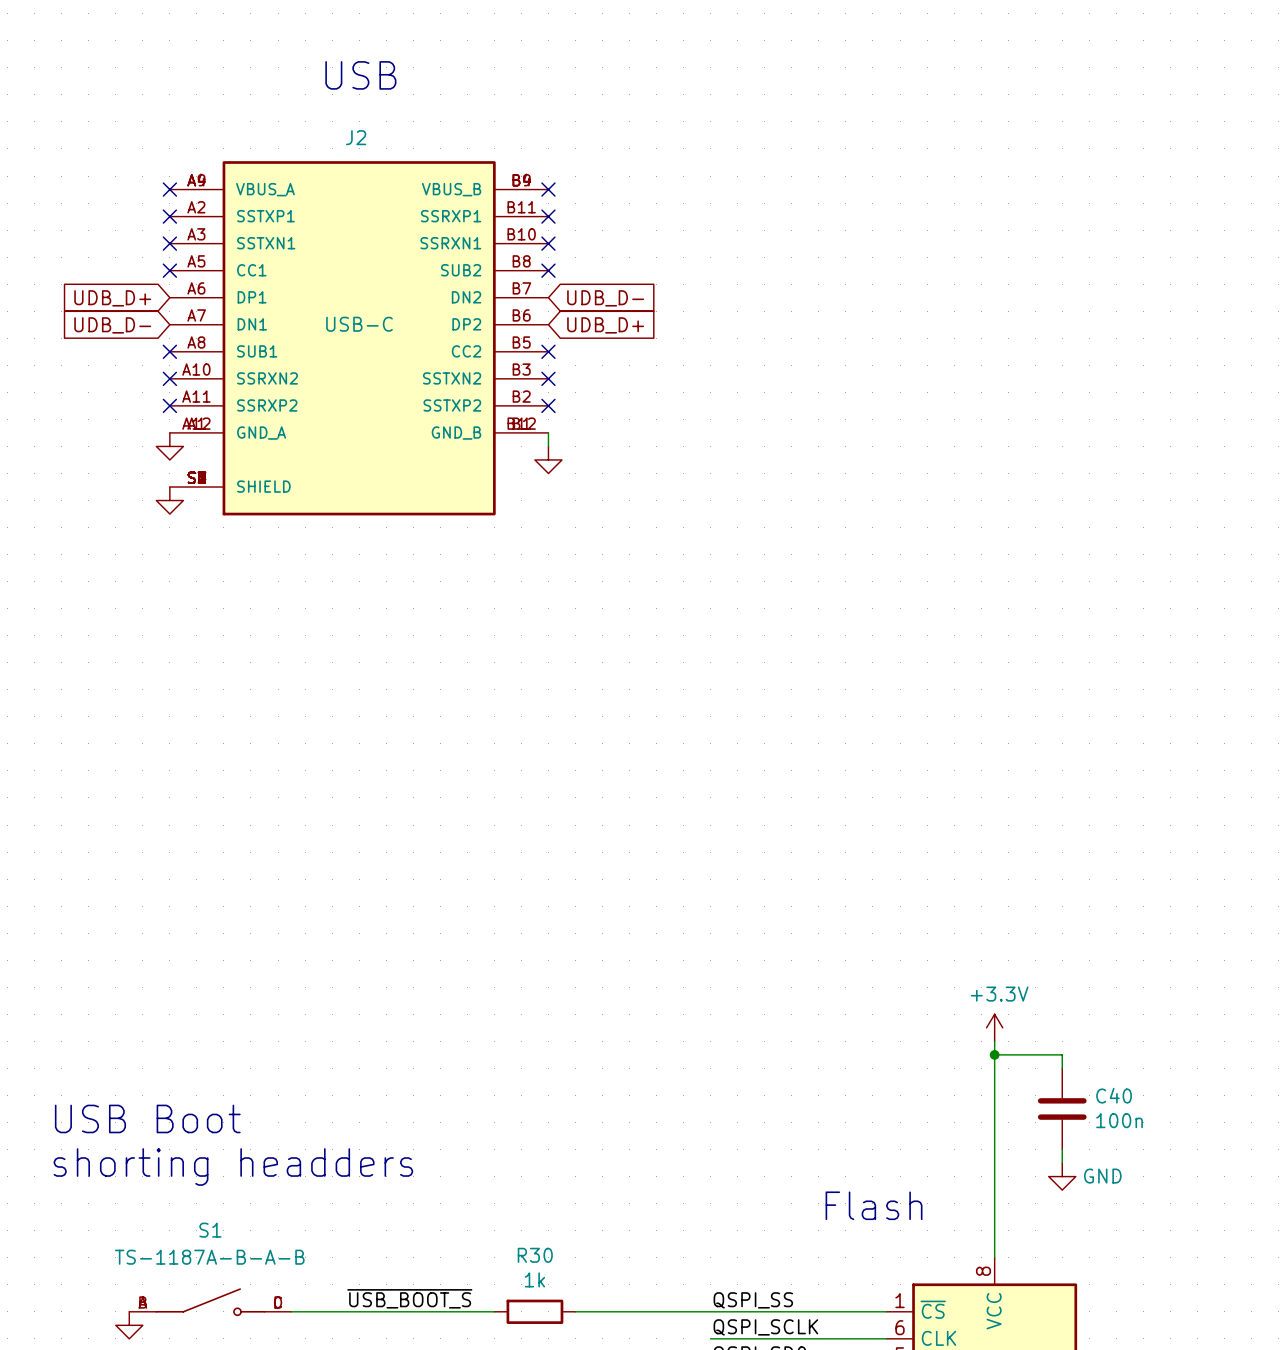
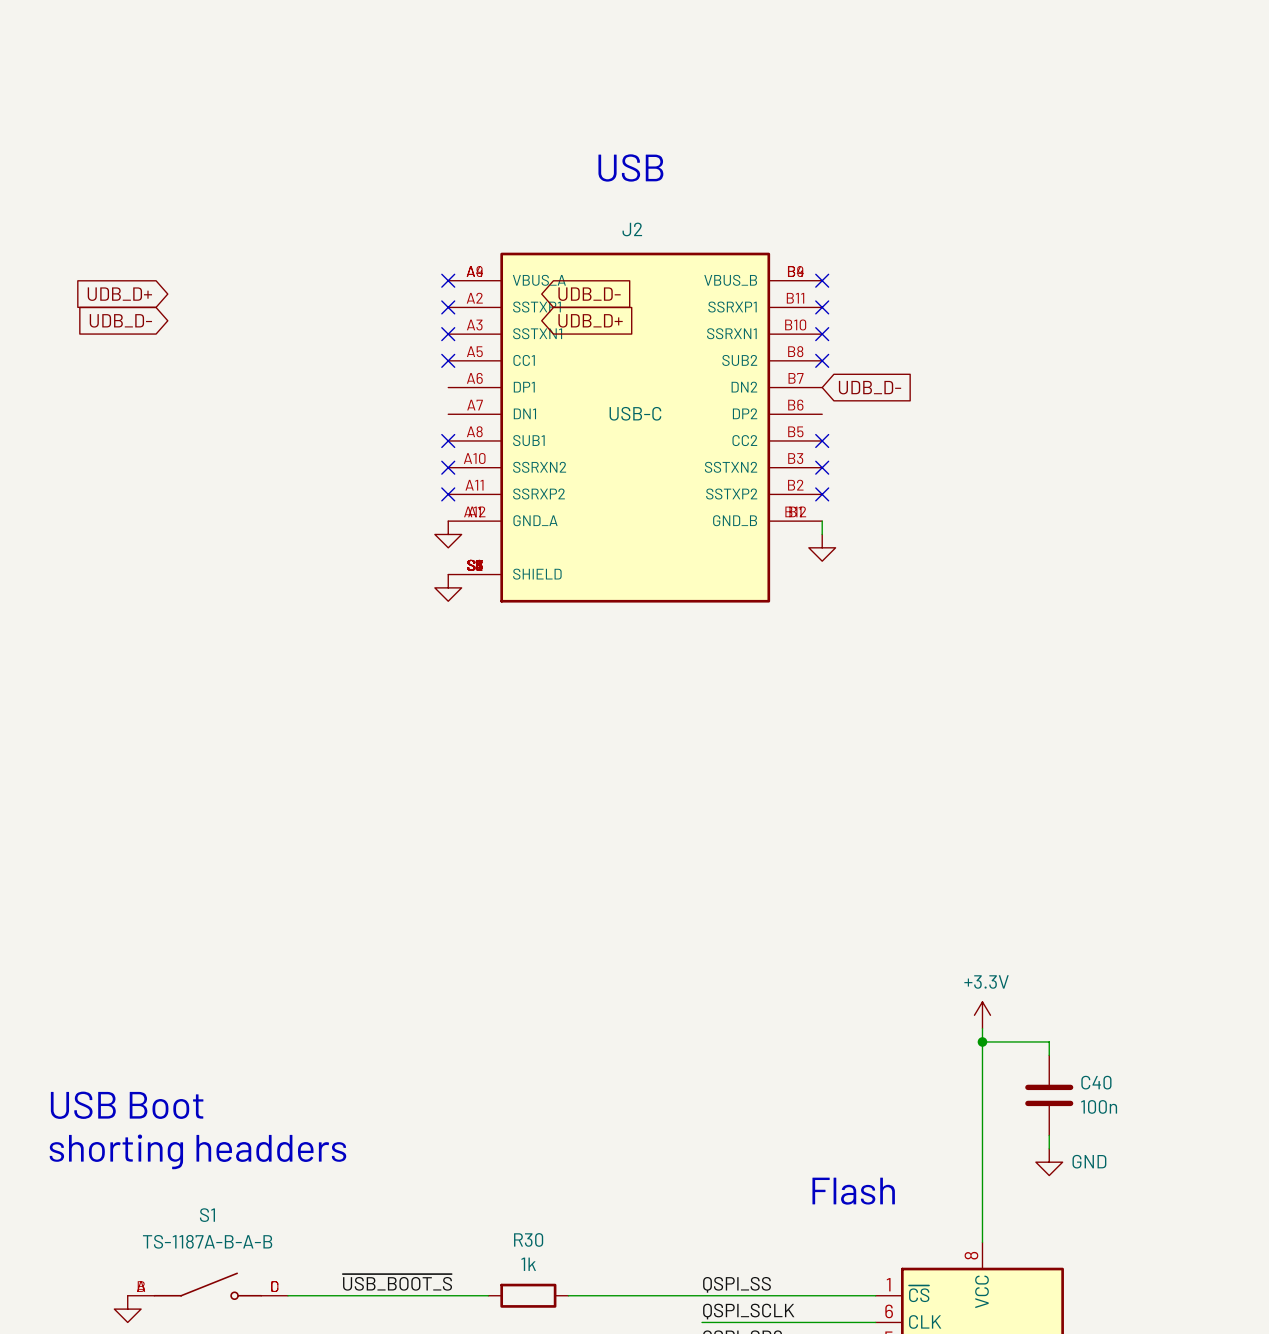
text: USB (360, 75) -> none
text: none -> USB (630, 167)
no-connect mark: (169, 189) -> none
no-connect mark: (548, 189) -> none
no-connect mark: (169, 216) -> none
no-connect mark: (548, 216) -> none
no-connect mark: (169, 243) -> none
no-connect mark: (548, 243) -> none
no-connect mark: (169, 270) -> none
no-connect mark: (548, 270) -> none
no-connect mark: none -> (448, 280)
no-connect mark: none -> (822, 280)
no-connect mark: none -> (448, 307)
no-connect mark: none -> (822, 307)
J2 position: (359, 338) -> (635, 427)
no-connect mark: none -> (448, 334)
no-connect mark: none -> (822, 334)
no-connect mark: (169, 351) -> none
no-connect mark: (548, 351) -> none
no-connect mark: none -> (448, 360)
no-connect mark: none -> (822, 360)
no-connect mark: (169, 378) -> none
no-connect mark: (548, 378) -> none
global label: none -> UDB_D- (870, 387)
no-connect mark: (169, 405) -> none
no-connect mark: (548, 405) -> none
power symbol: (169, 446) -> none
no-connect mark: none -> (448, 440)
no-connect mark: none -> (822, 440)
power symbol: (548, 459) -> none
no-connect mark: none -> (448, 467)
no-connect mark: none -> (822, 467)
power symbol: (169, 500) -> none
no-connect mark: none -> (448, 494)
no-connect mark: none -> (822, 494)
wire: none -> (822, 521) (822, 534)
power symbol: none -> (448, 534)
power symbol: none -> (822, 547)
power symbol: none -> (448, 587)

